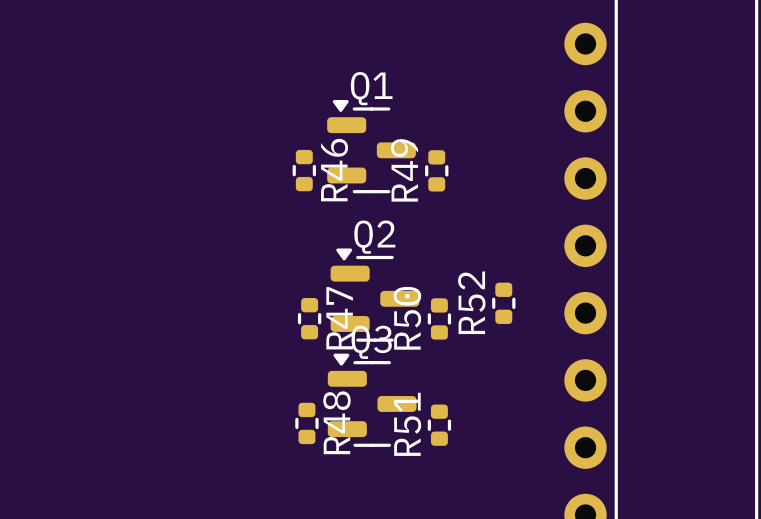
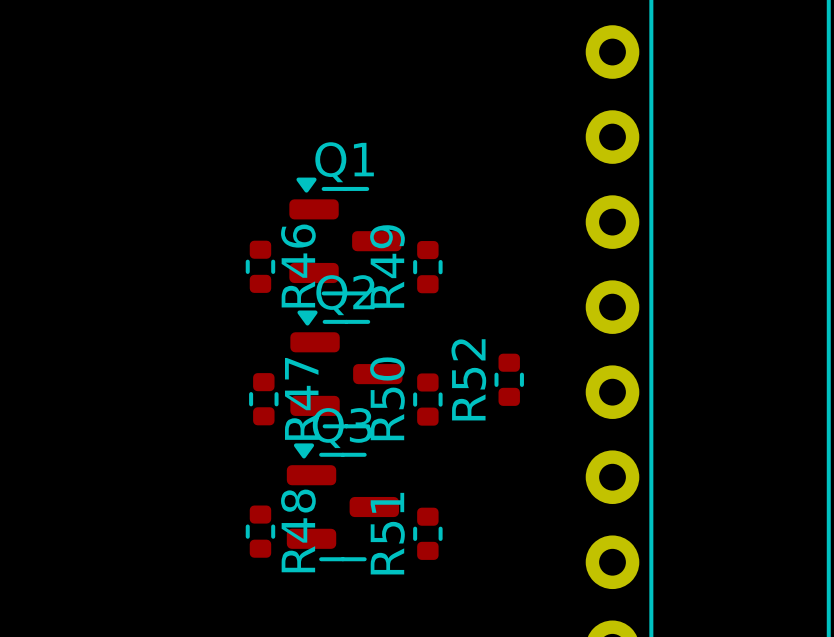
Q1 position: (371, 146) -> (345, 236)
R46 position: (304, 170) -> (260, 266)
R49 position: (436, 170) -> (427, 267)

